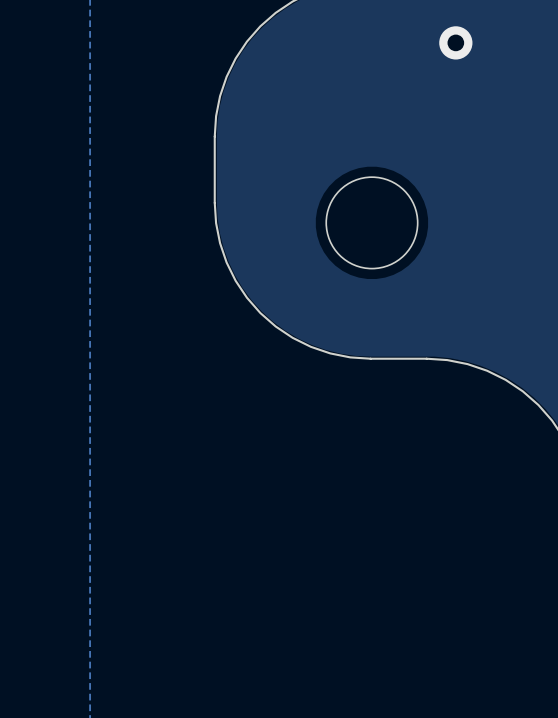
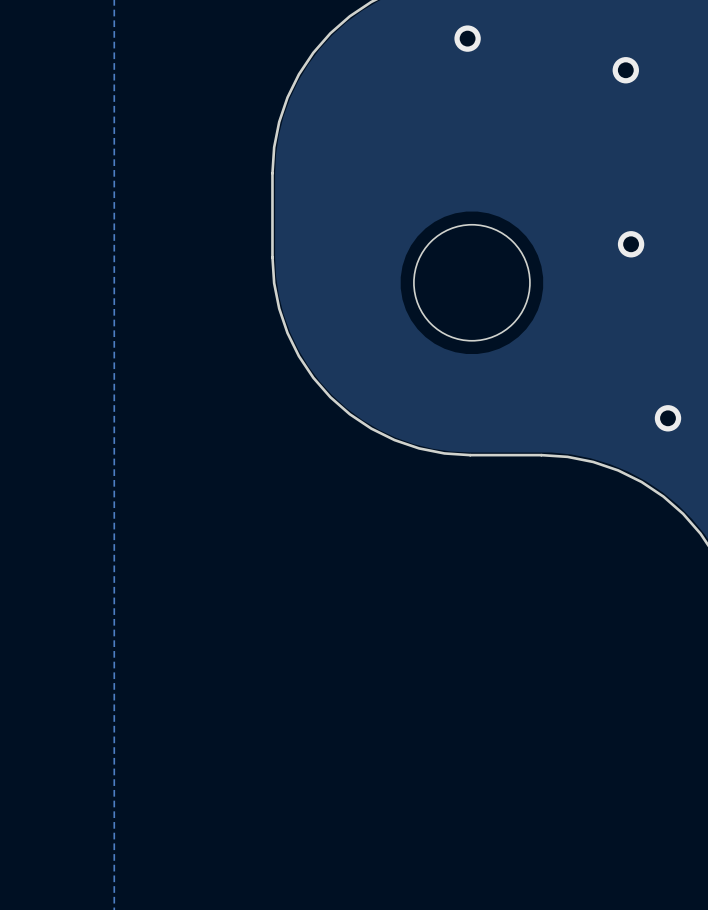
via: none -> (467, 38)
via: (455, 42) -> none
via: none -> (625, 70)
via: none -> (631, 244)
via: none -> (667, 418)

